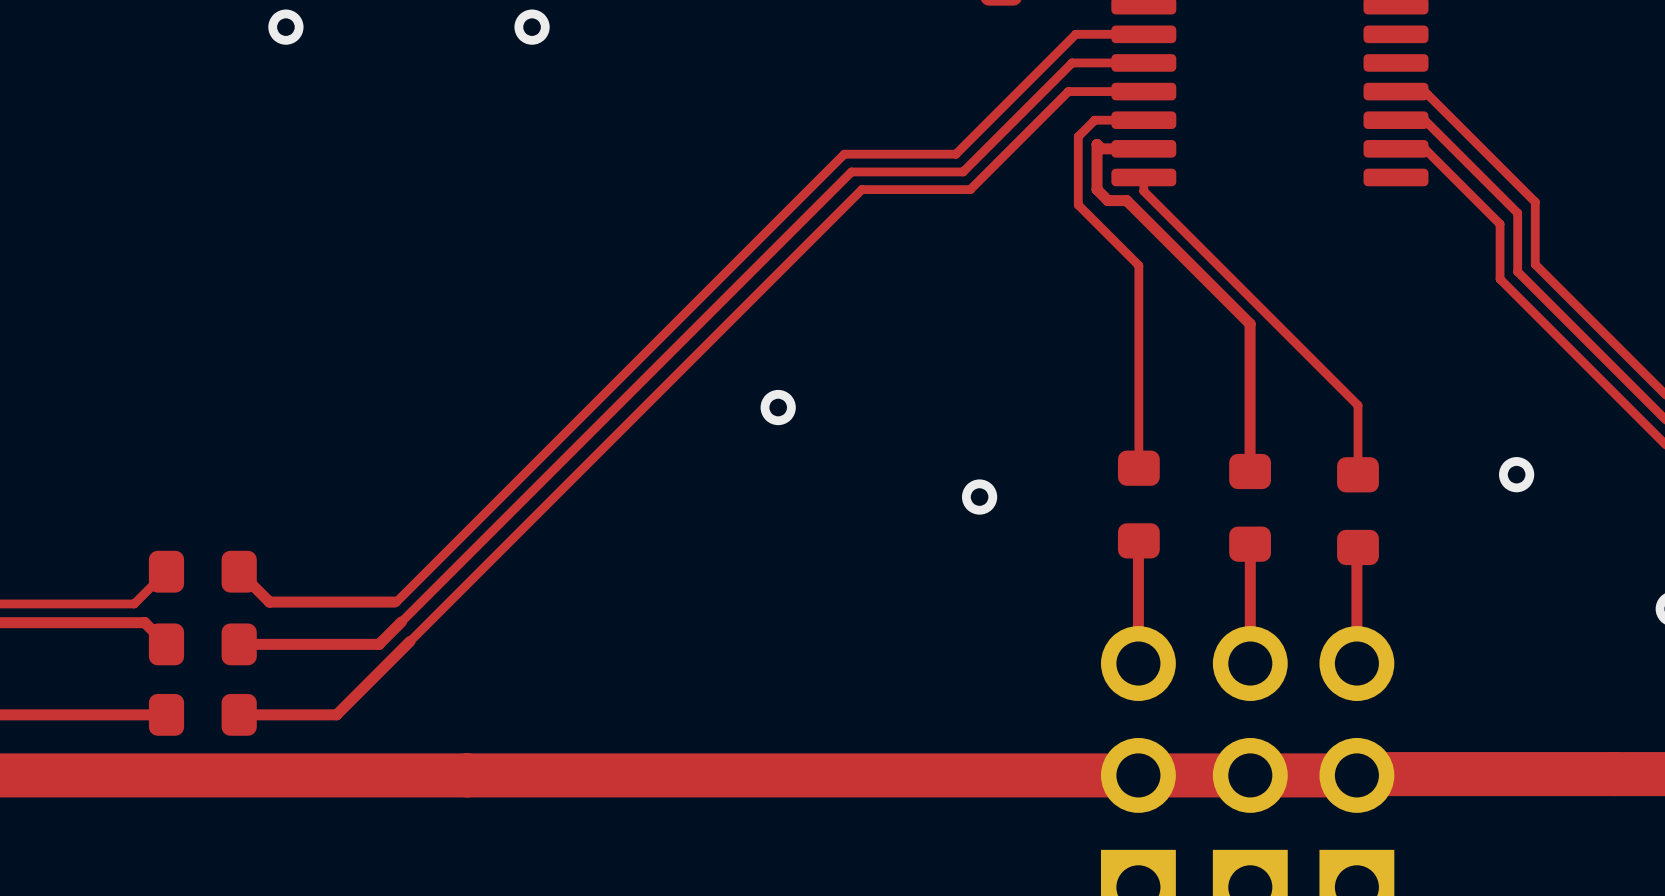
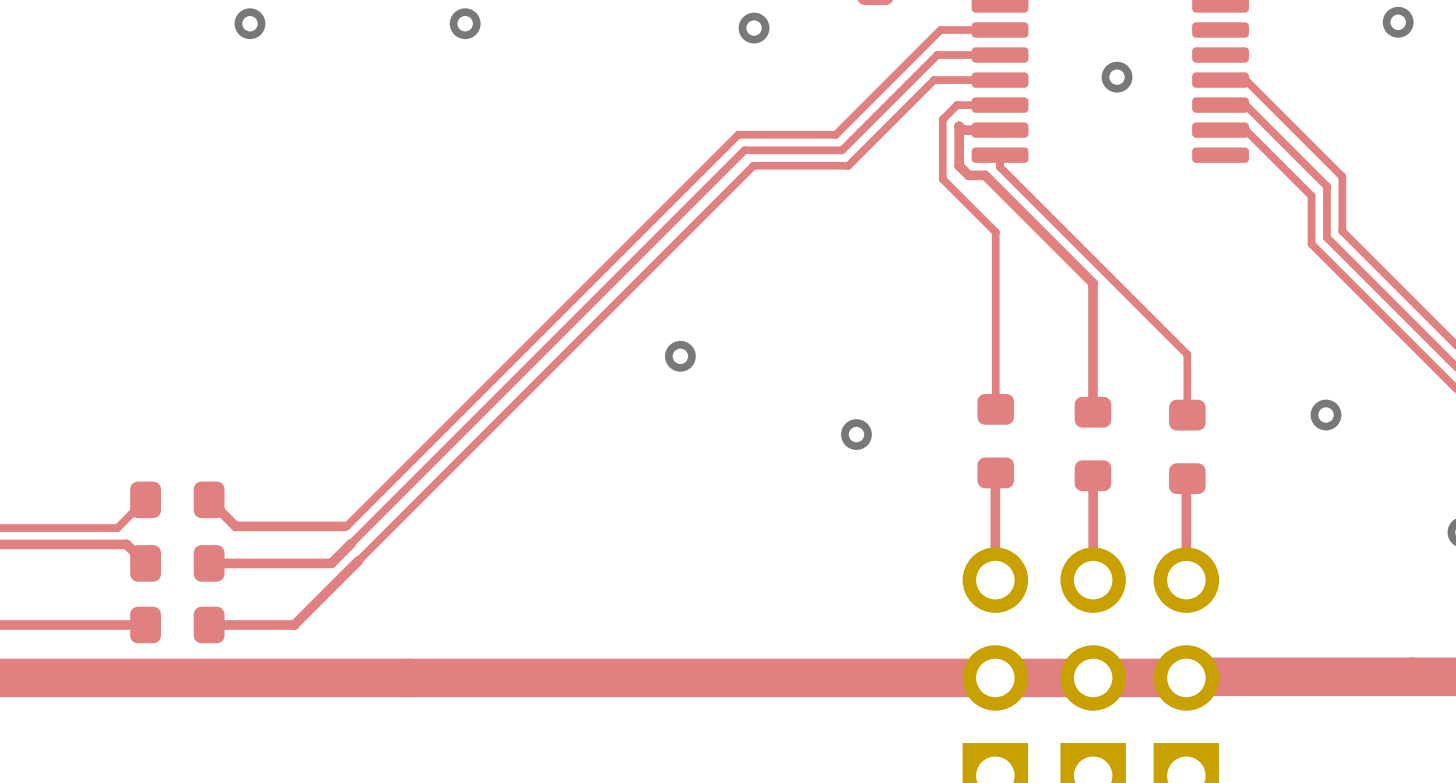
via: none -> (1398, 22)
via: none -> (754, 28)
via: none -> (1117, 77)

